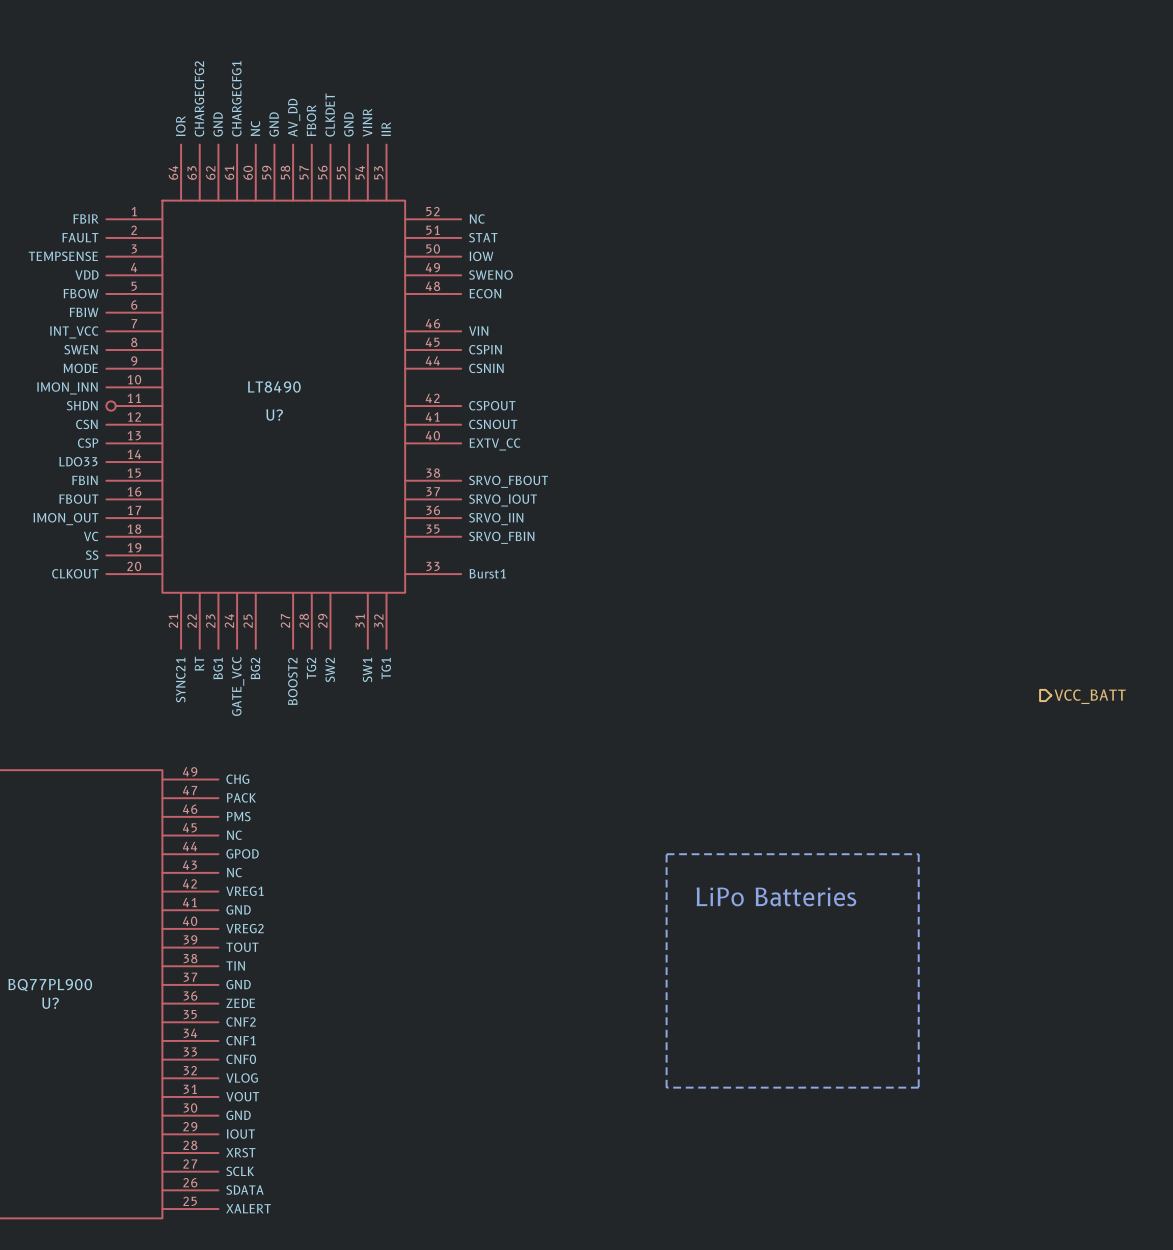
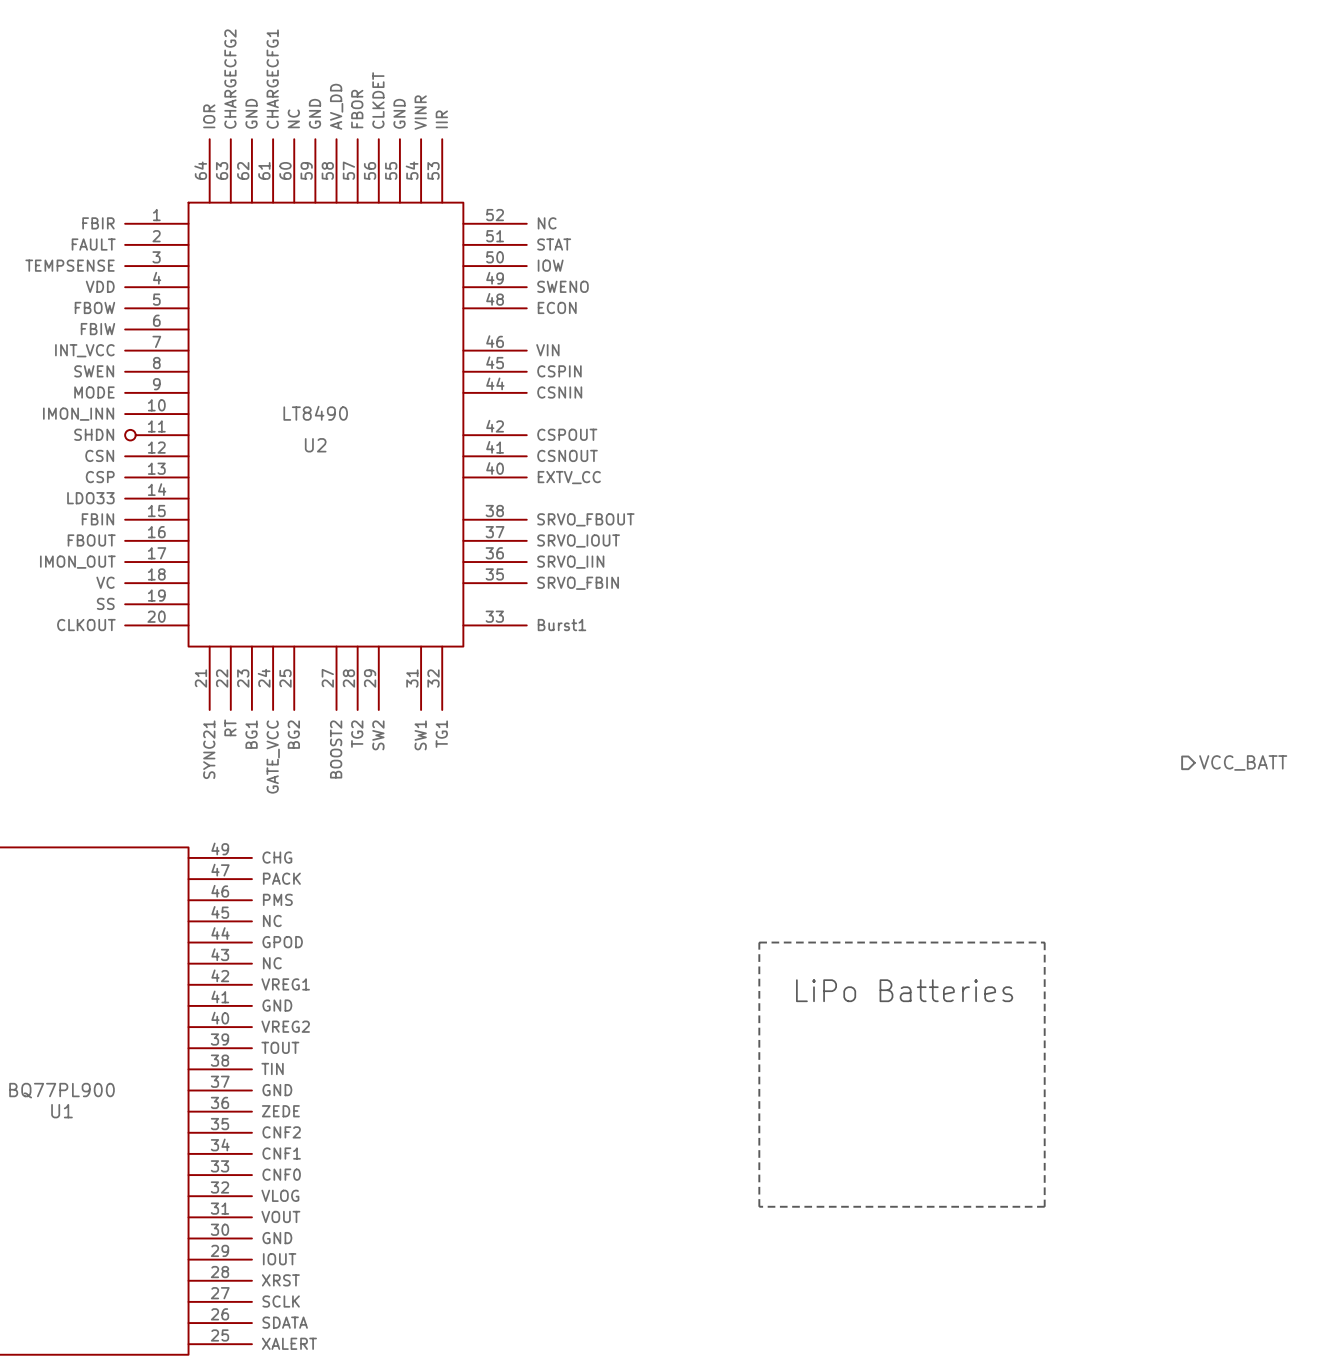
U? name: U? (274, 415) -> U2 (315, 445)
U? name: U? (50, 1003) -> U1 (62, 1111)

